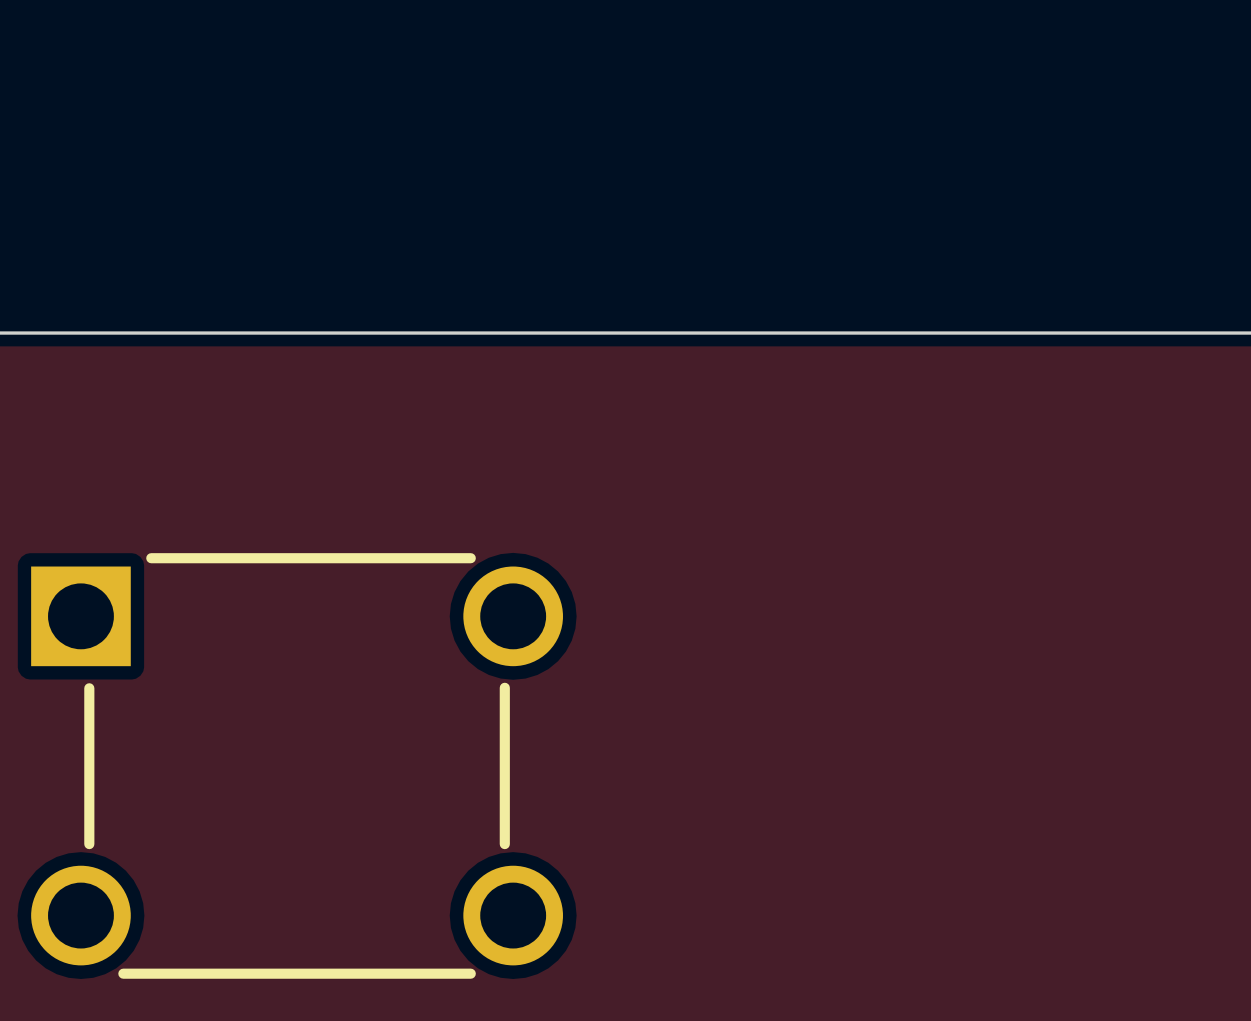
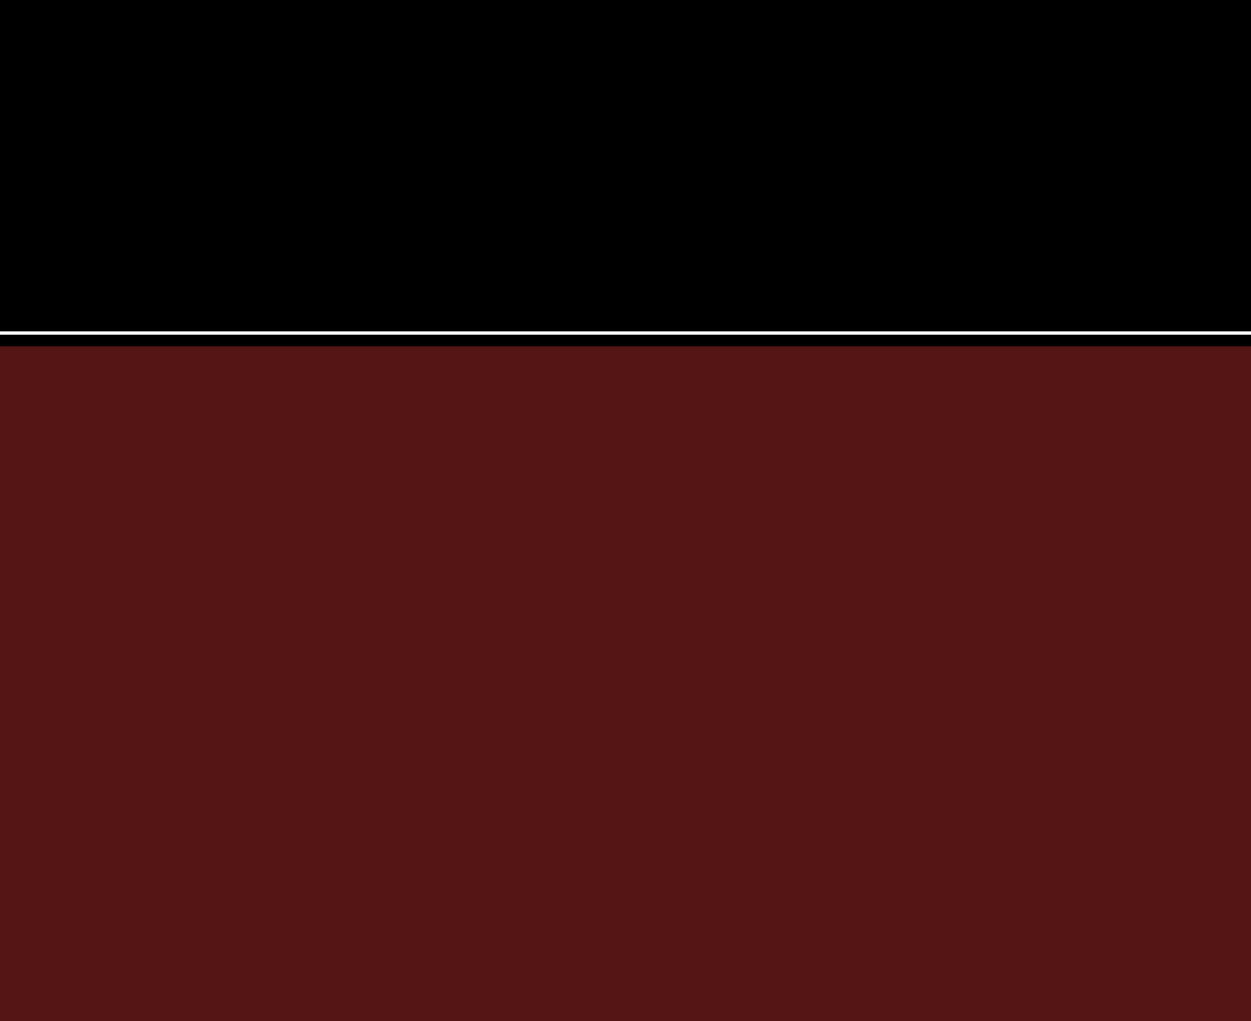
part: (297, 765) -> none

